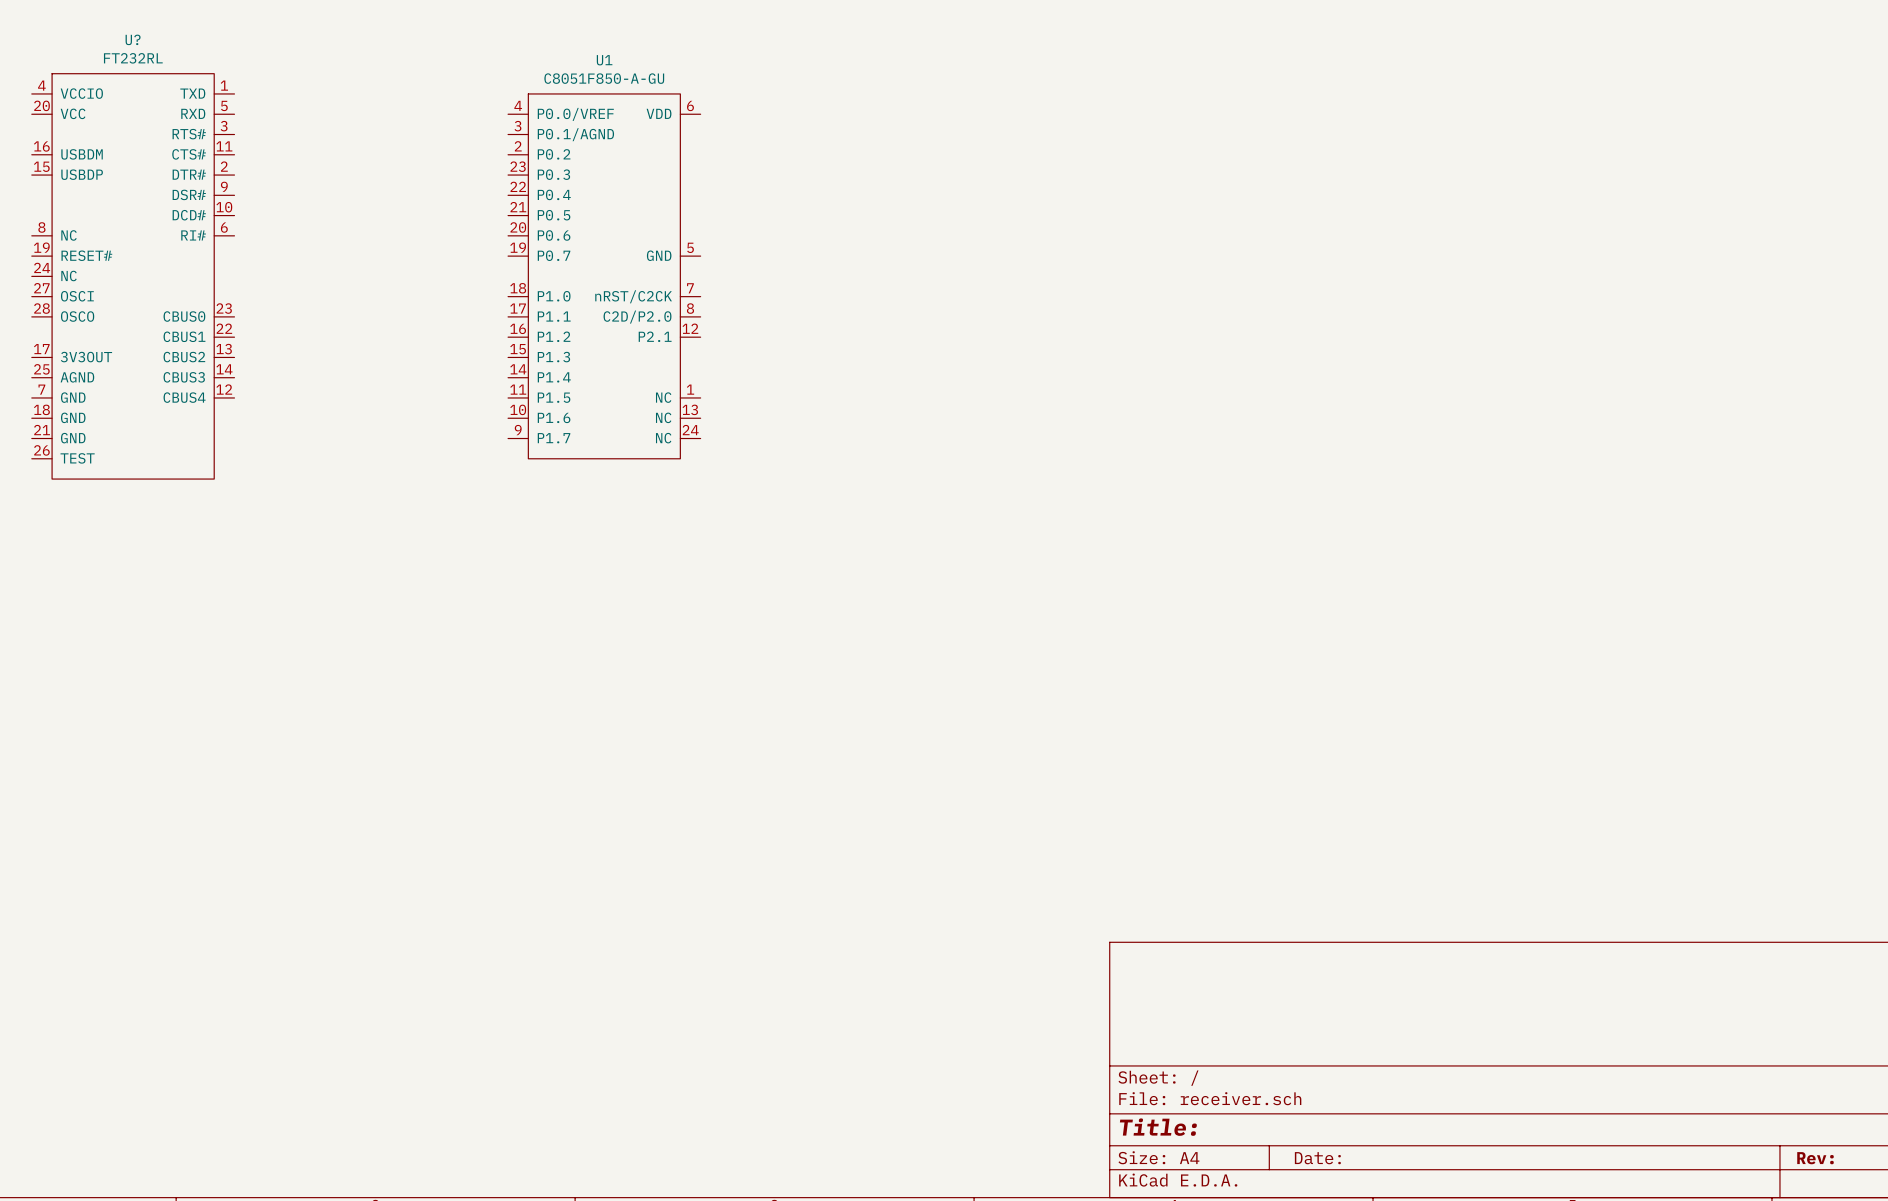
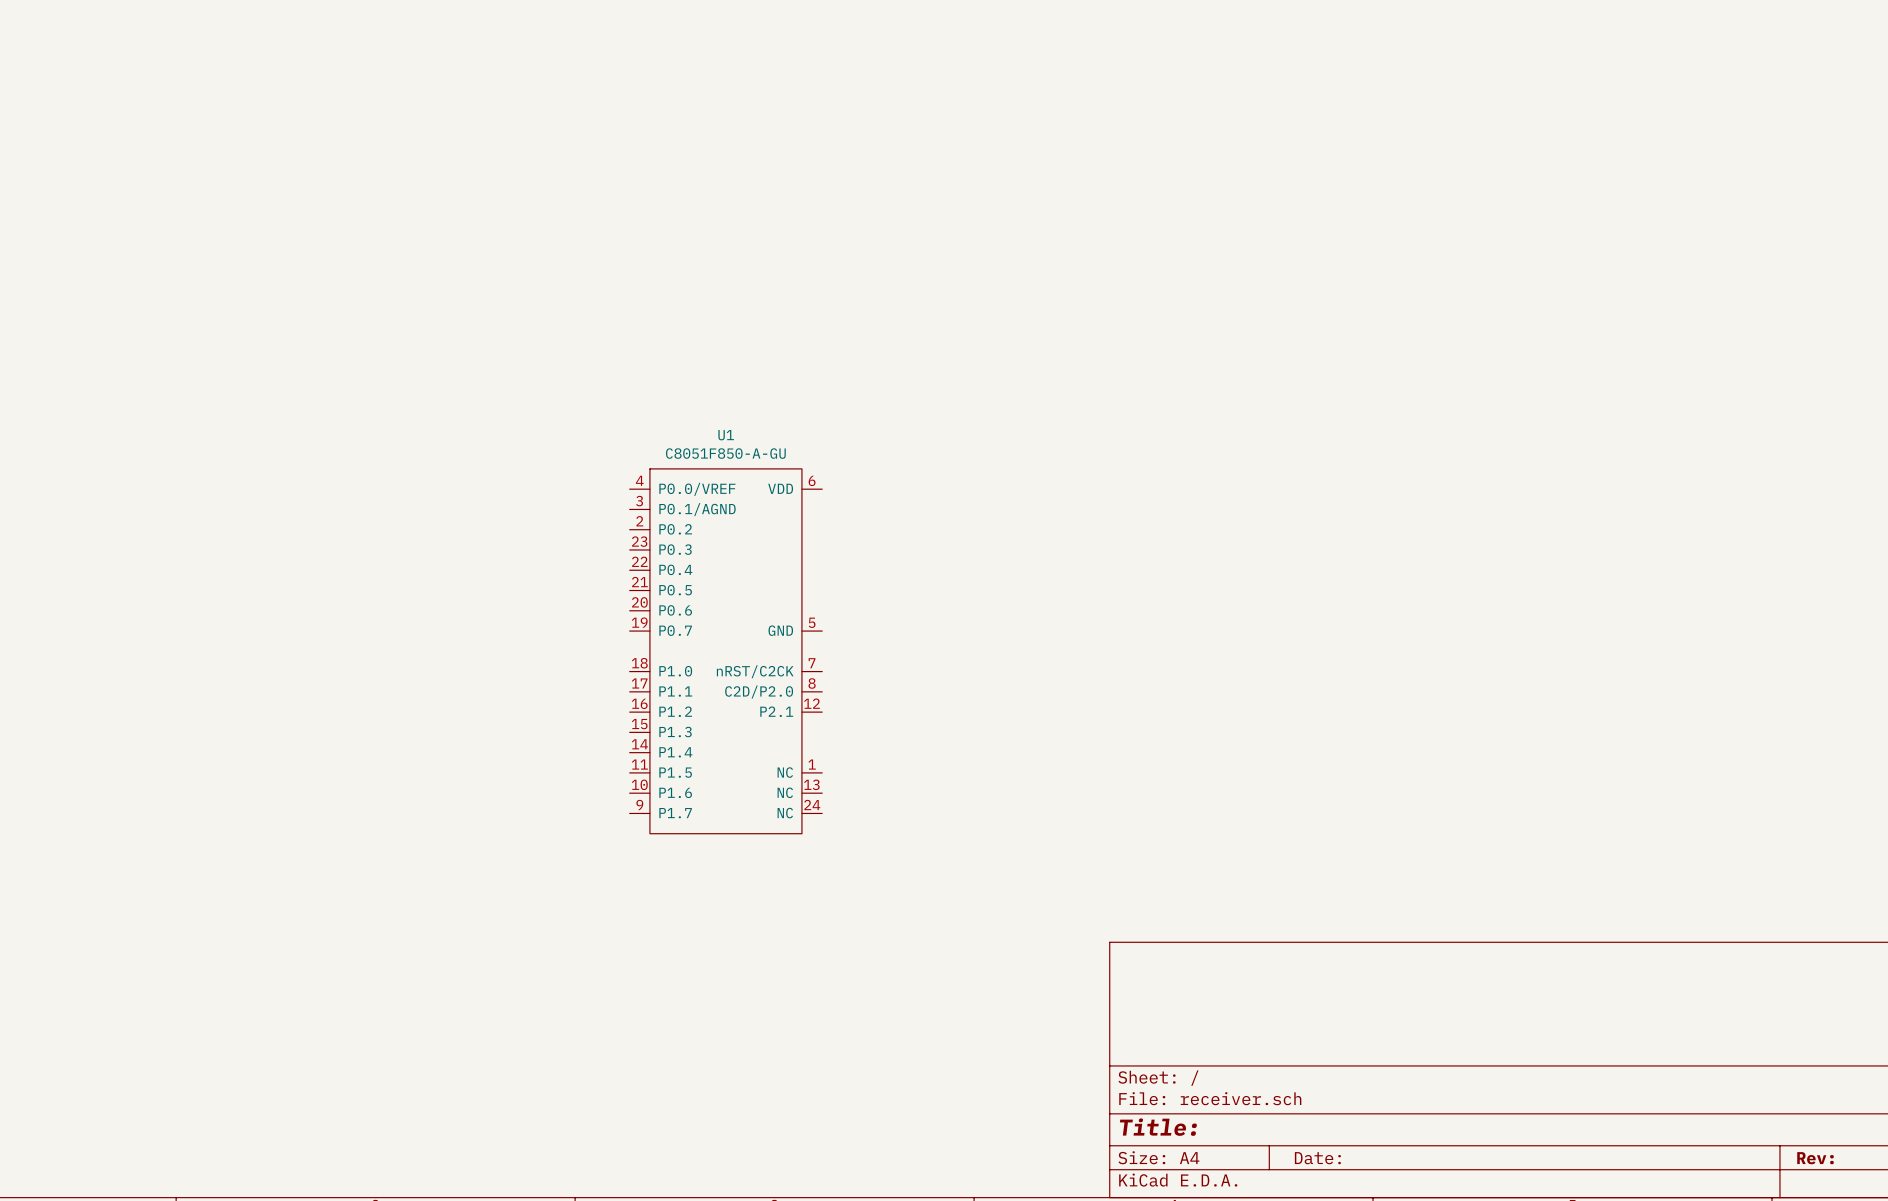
U?: FT232RL (133, 276) -> none
U1 position: (604, 276) -> (725, 651)

